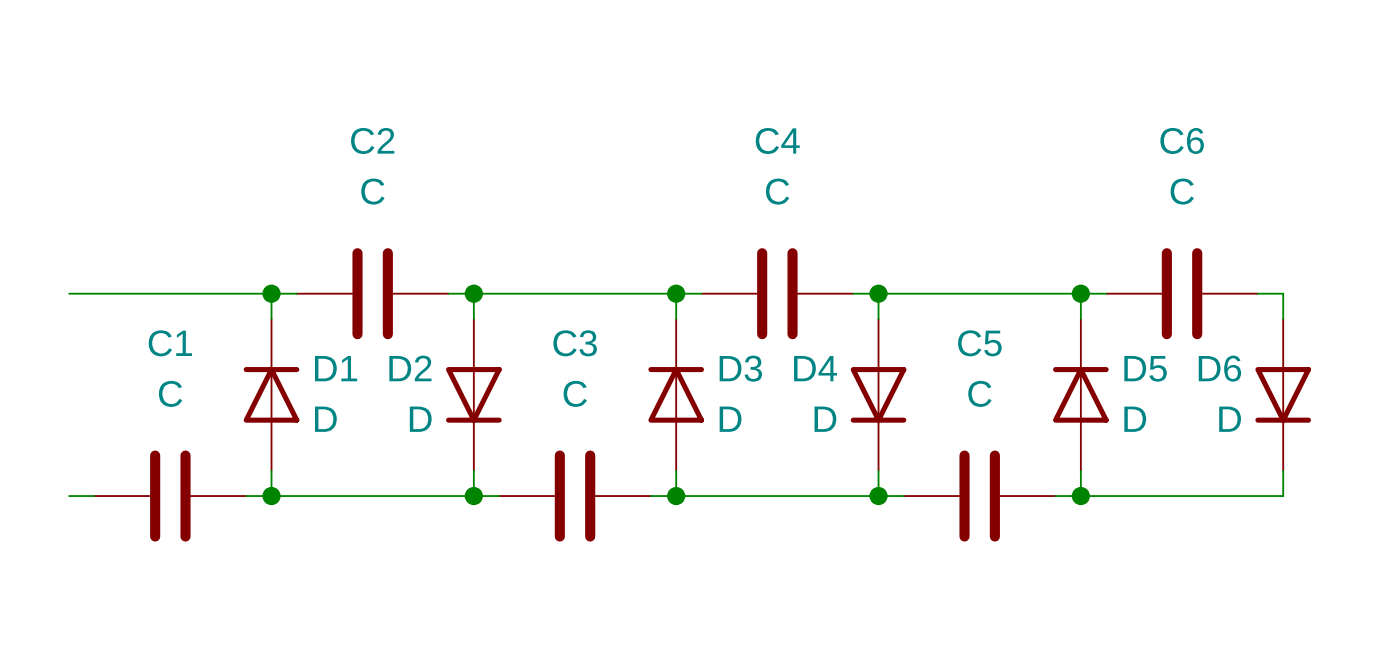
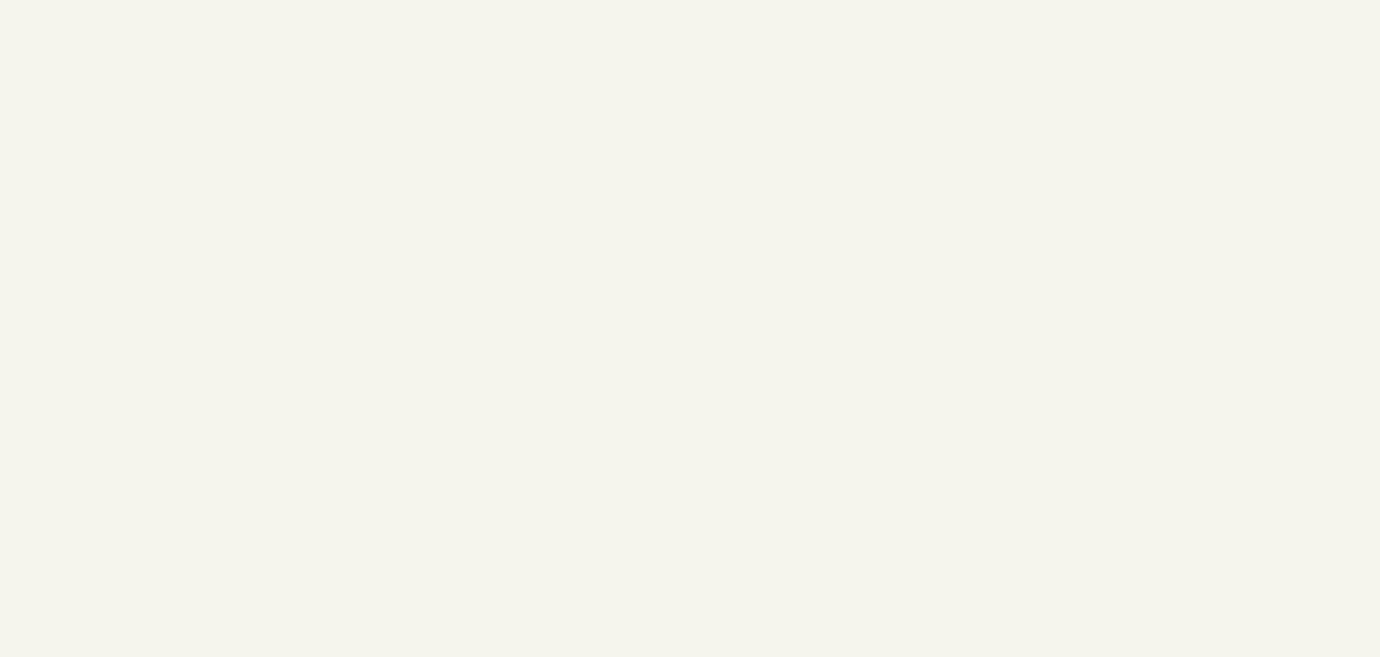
wire: (69, 293) (296, 293) -> none
wire: (271, 293) (271, 318) -> none
junction: (271, 293) -> none
C2: C (372, 293) -> none
wire: (448, 293) (701, 293) -> none
wire: (473, 293) (473, 318) -> none
junction: (473, 293) -> none
wire: (676, 293) (676, 318) -> none
junction: (676, 293) -> none
C4: C (777, 293) -> none
wire: (853, 293) (1106, 293) -> none
wire: (878, 293) (878, 318) -> none
junction: (878, 293) -> none
wire: (1080, 293) (1080, 318) -> none
junction: (1080, 293) -> none
C6: C (1182, 293) -> none
wire: (1257, 293) (1283, 293) (1283, 318) -> none
D1: D (271, 394) -> none
D2: D (473, 394) -> none
D3: D (676, 394) -> none
D4: D (878, 394) -> none
D5: D (1080, 394) -> none
D6: D (1283, 394) -> none
wire: (271, 470) (271, 496) -> none
wire: (473, 470) (473, 496) -> none
wire: (676, 470) (676, 496) -> none
wire: (878, 470) (878, 496) -> none
wire: (1080, 470) (1080, 496) -> none
wire: (1283, 470) (1283, 496) (1055, 496) -> none
wire: (69, 496) (94, 496) -> none
C1: C (170, 496) -> none
wire: (246, 496) (499, 496) -> none
junction: (271, 496) -> none
junction: (473, 496) -> none
C3: C (575, 496) -> none
wire: (650, 496) (903, 496) -> none
junction: (676, 496) -> none
junction: (878, 496) -> none
C5: C (979, 496) -> none
junction: (1080, 496) -> none

